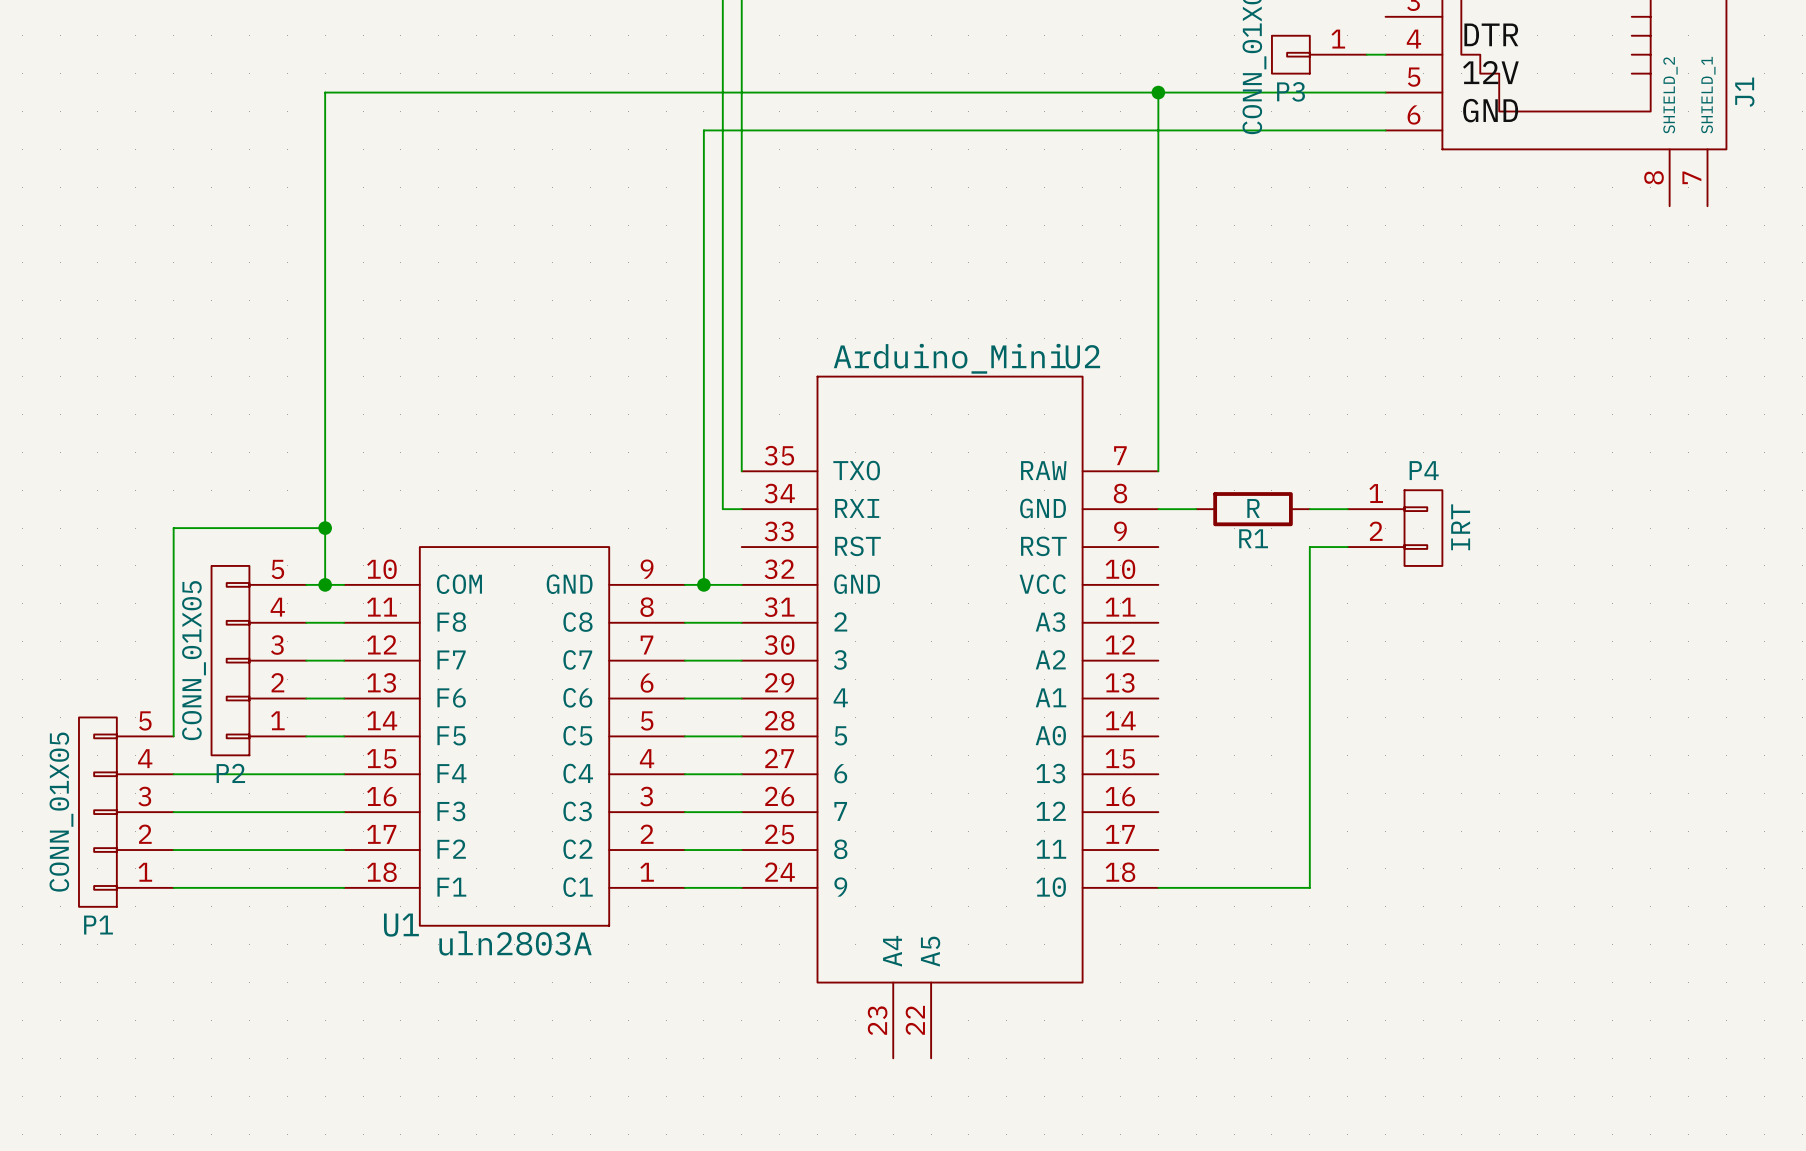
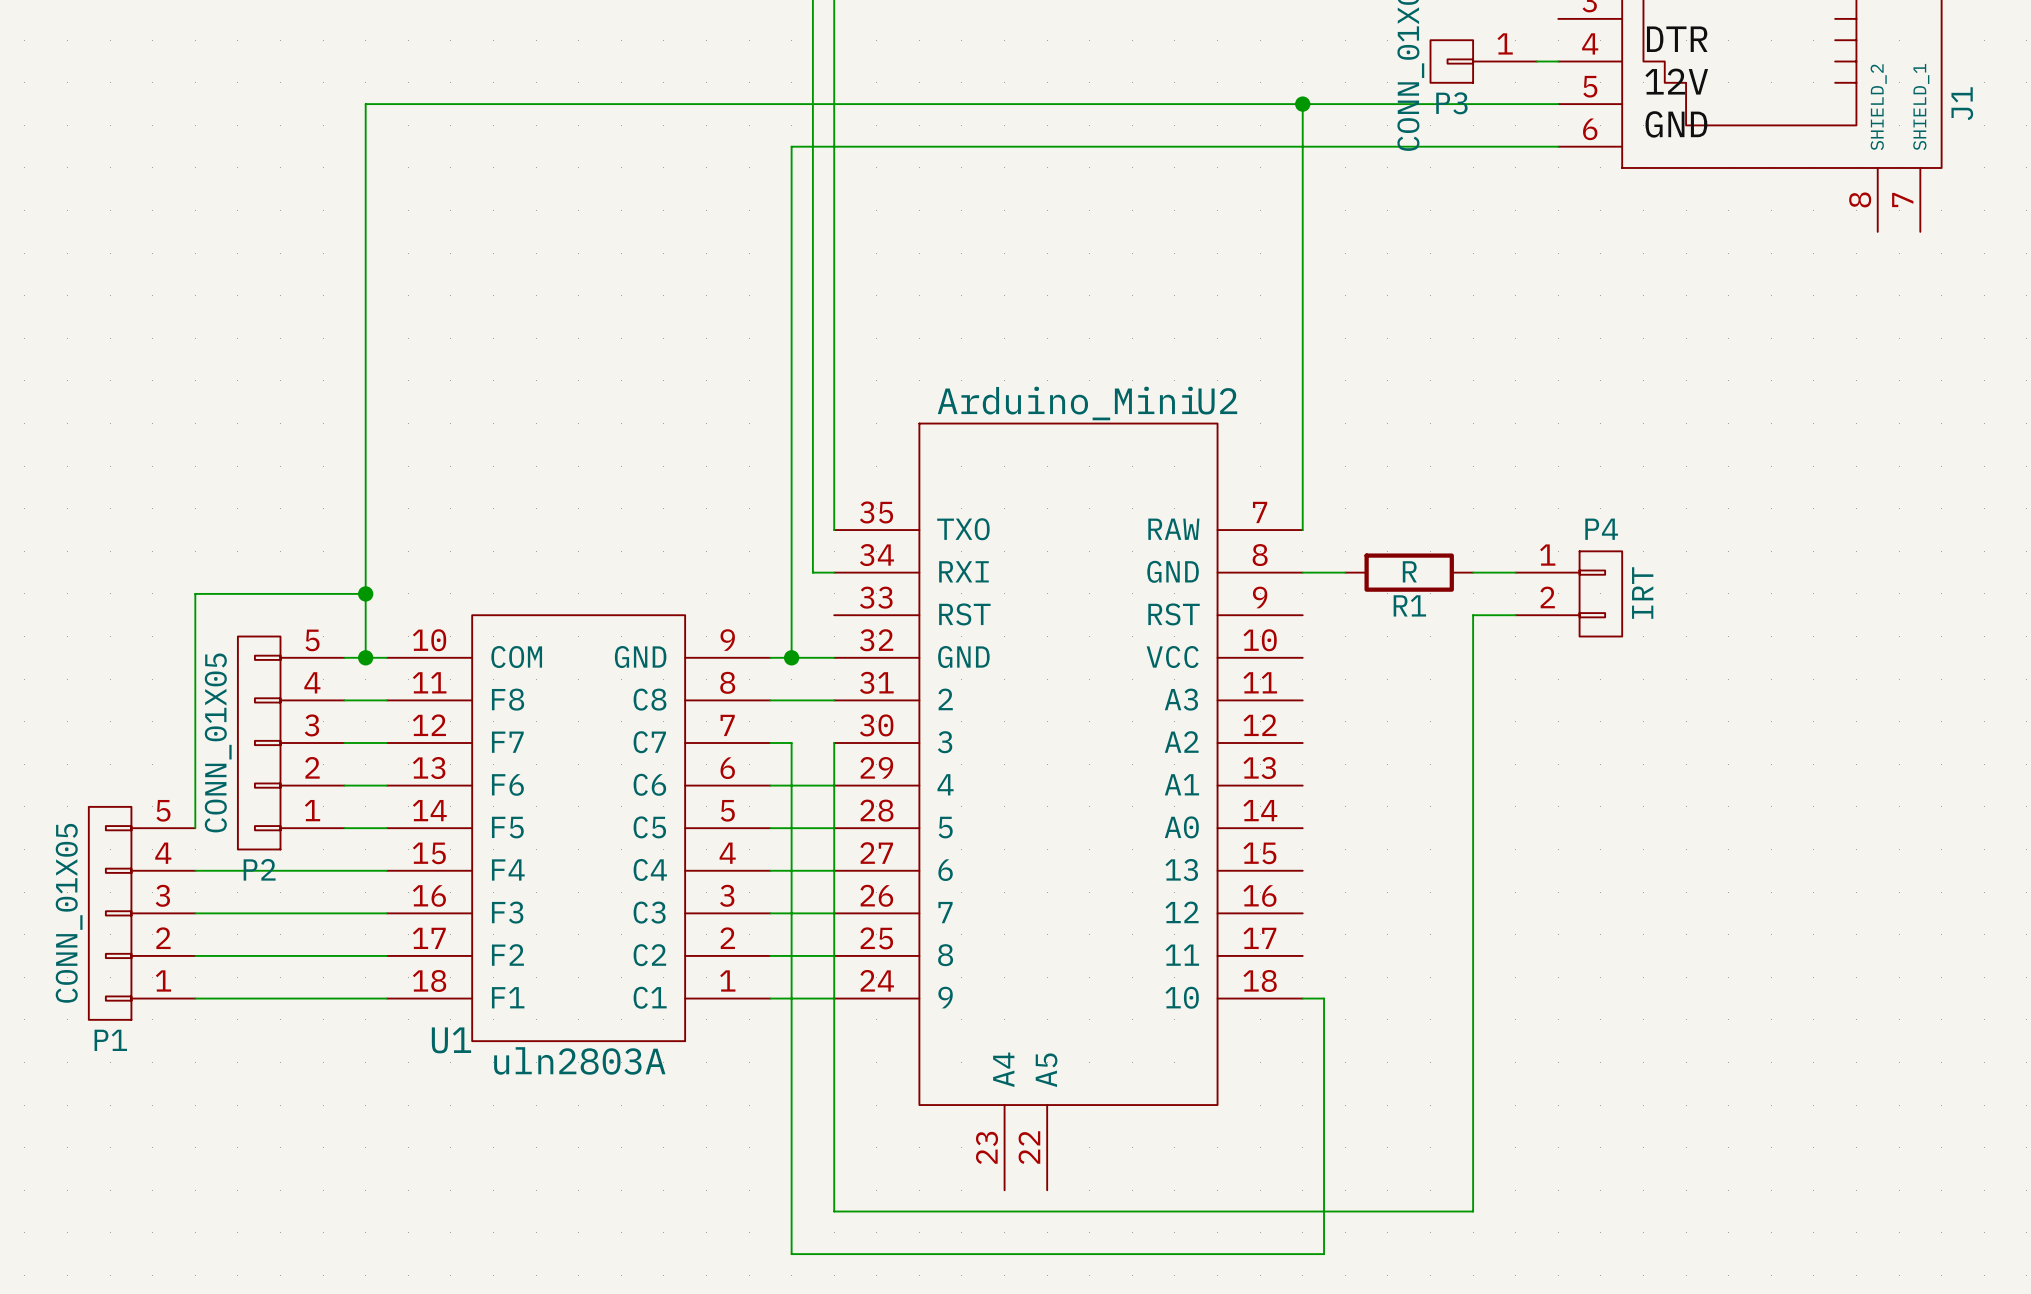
wire: (703, 660) (741, 660) -> (791, 742) (791, 1254) (1324, 1254) (1324, 998)
wire: (1177, 887) (1309, 887) -> (834, 742) (834, 1211) (1473, 1211) (1473, 998)

